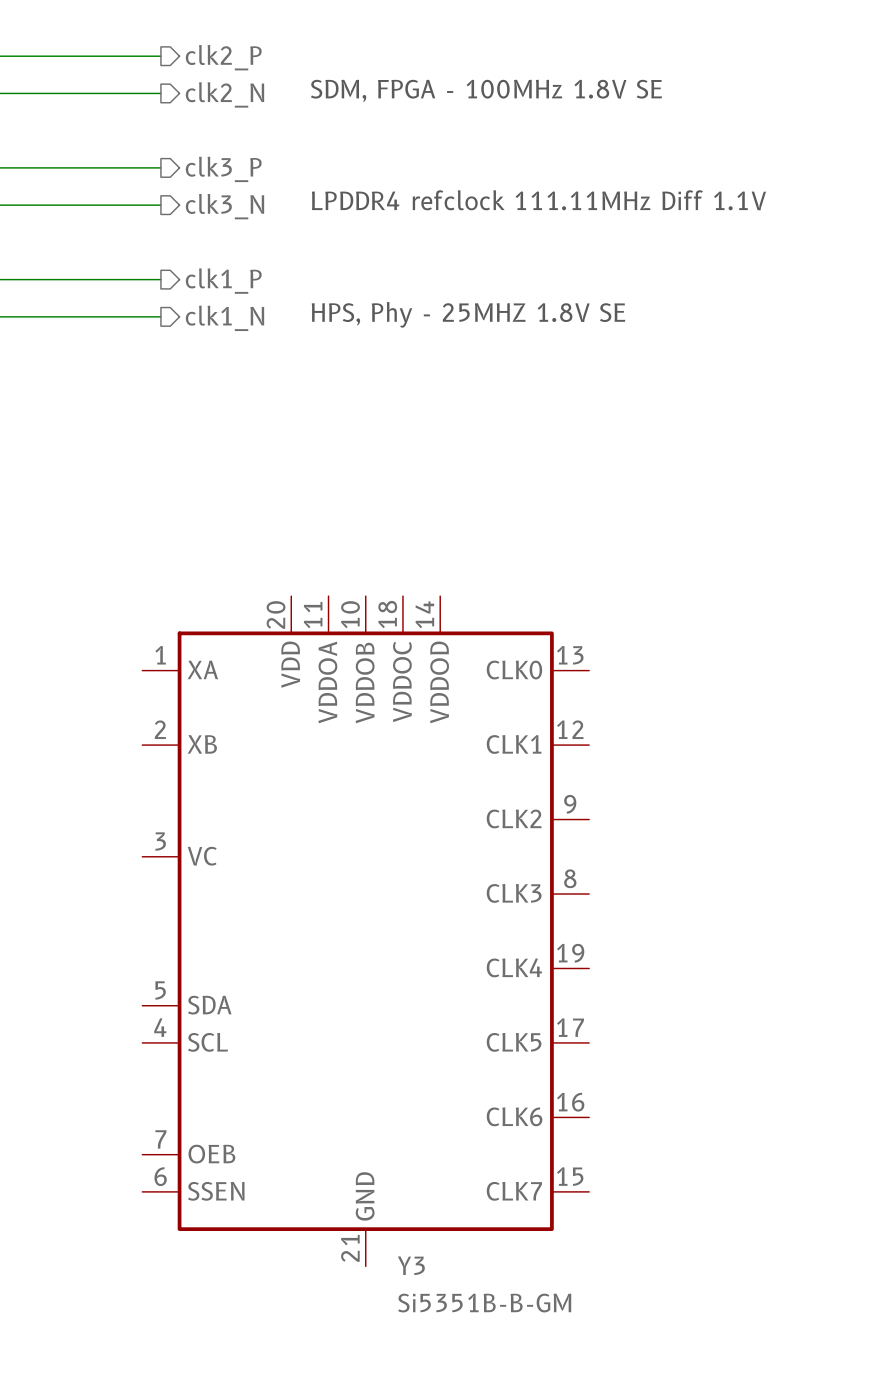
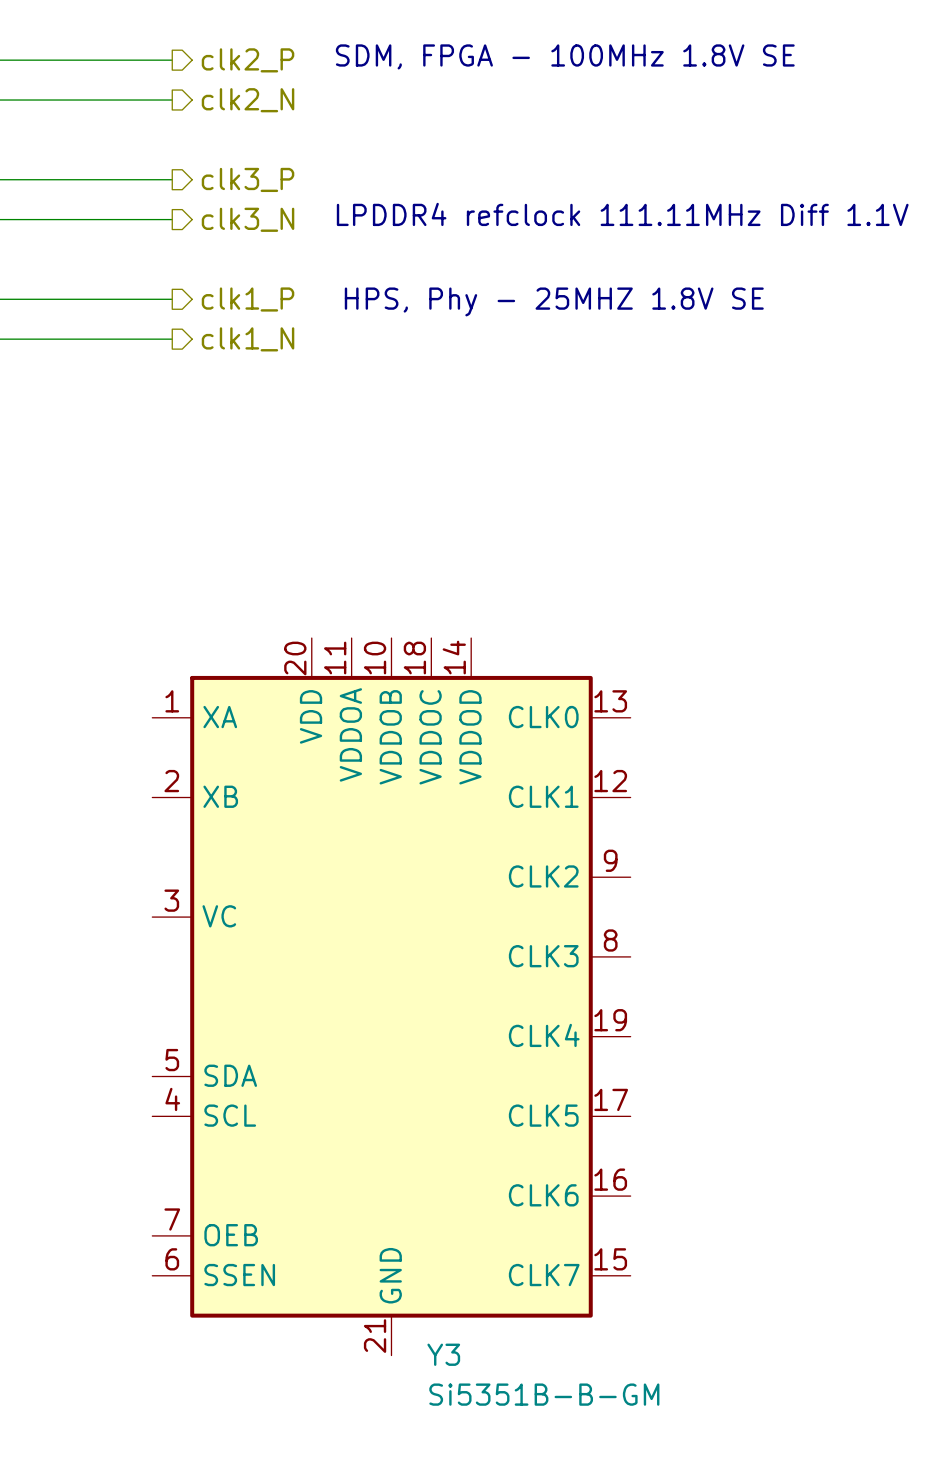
text position: SDM, FPGA - 100MHz 1.8V SE (486, 90) -> SDM, FPGA - 100MHz 1.8V SE (565, 56)
text position: HPS, Phy - 25MHZ 1.8V SE (468, 314) -> HPS, Phy - 25MHZ 1.8V SE (554, 301)

